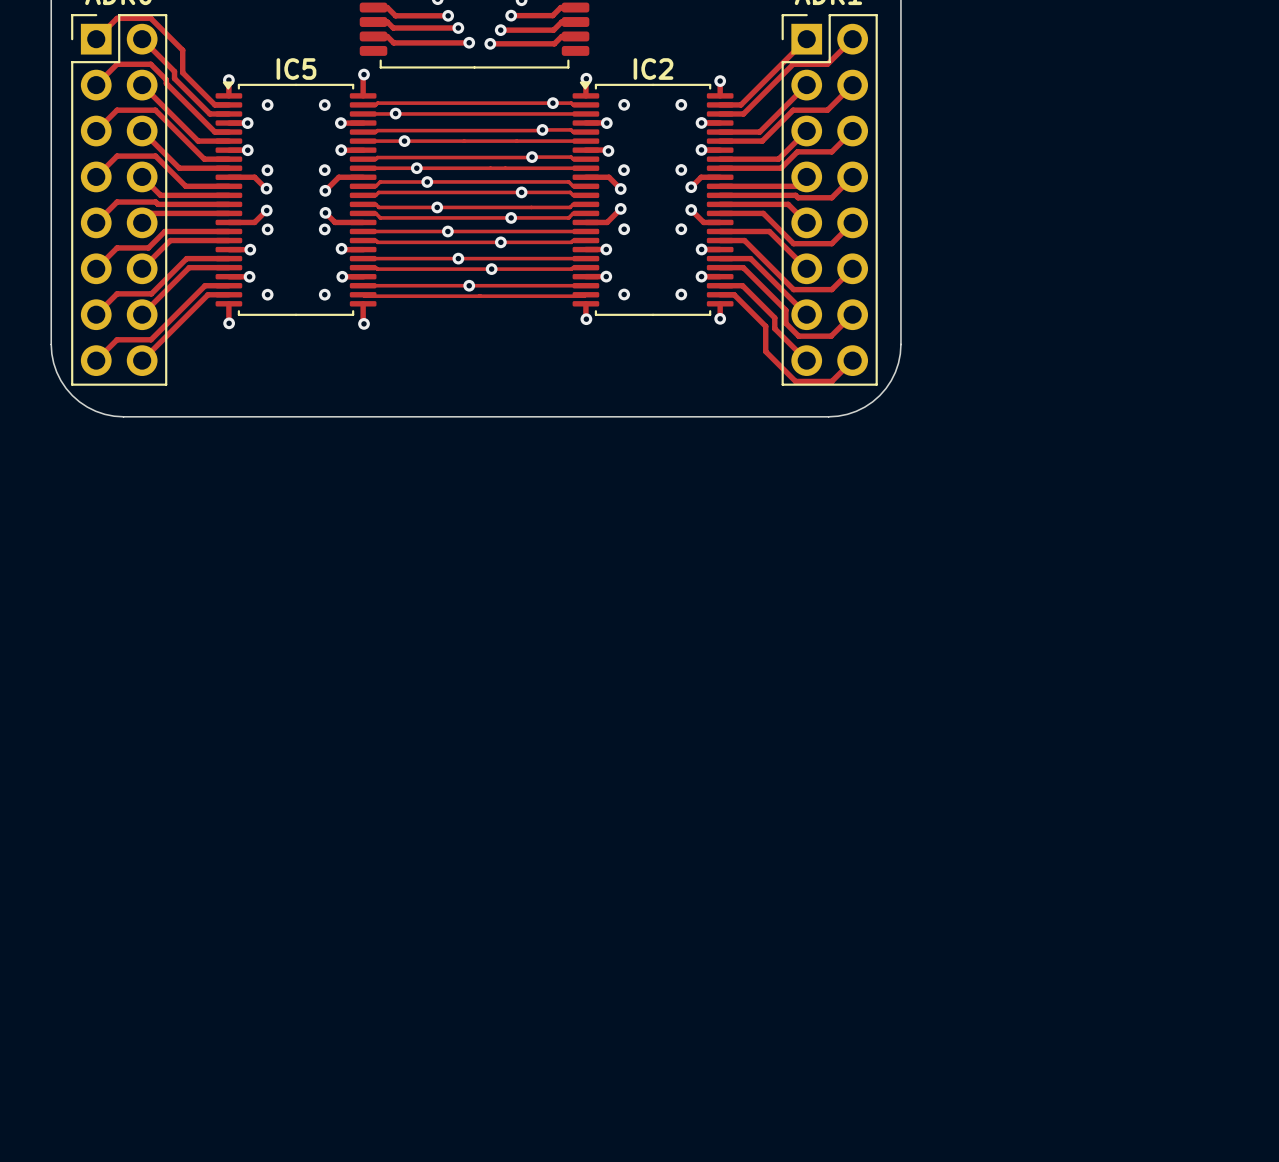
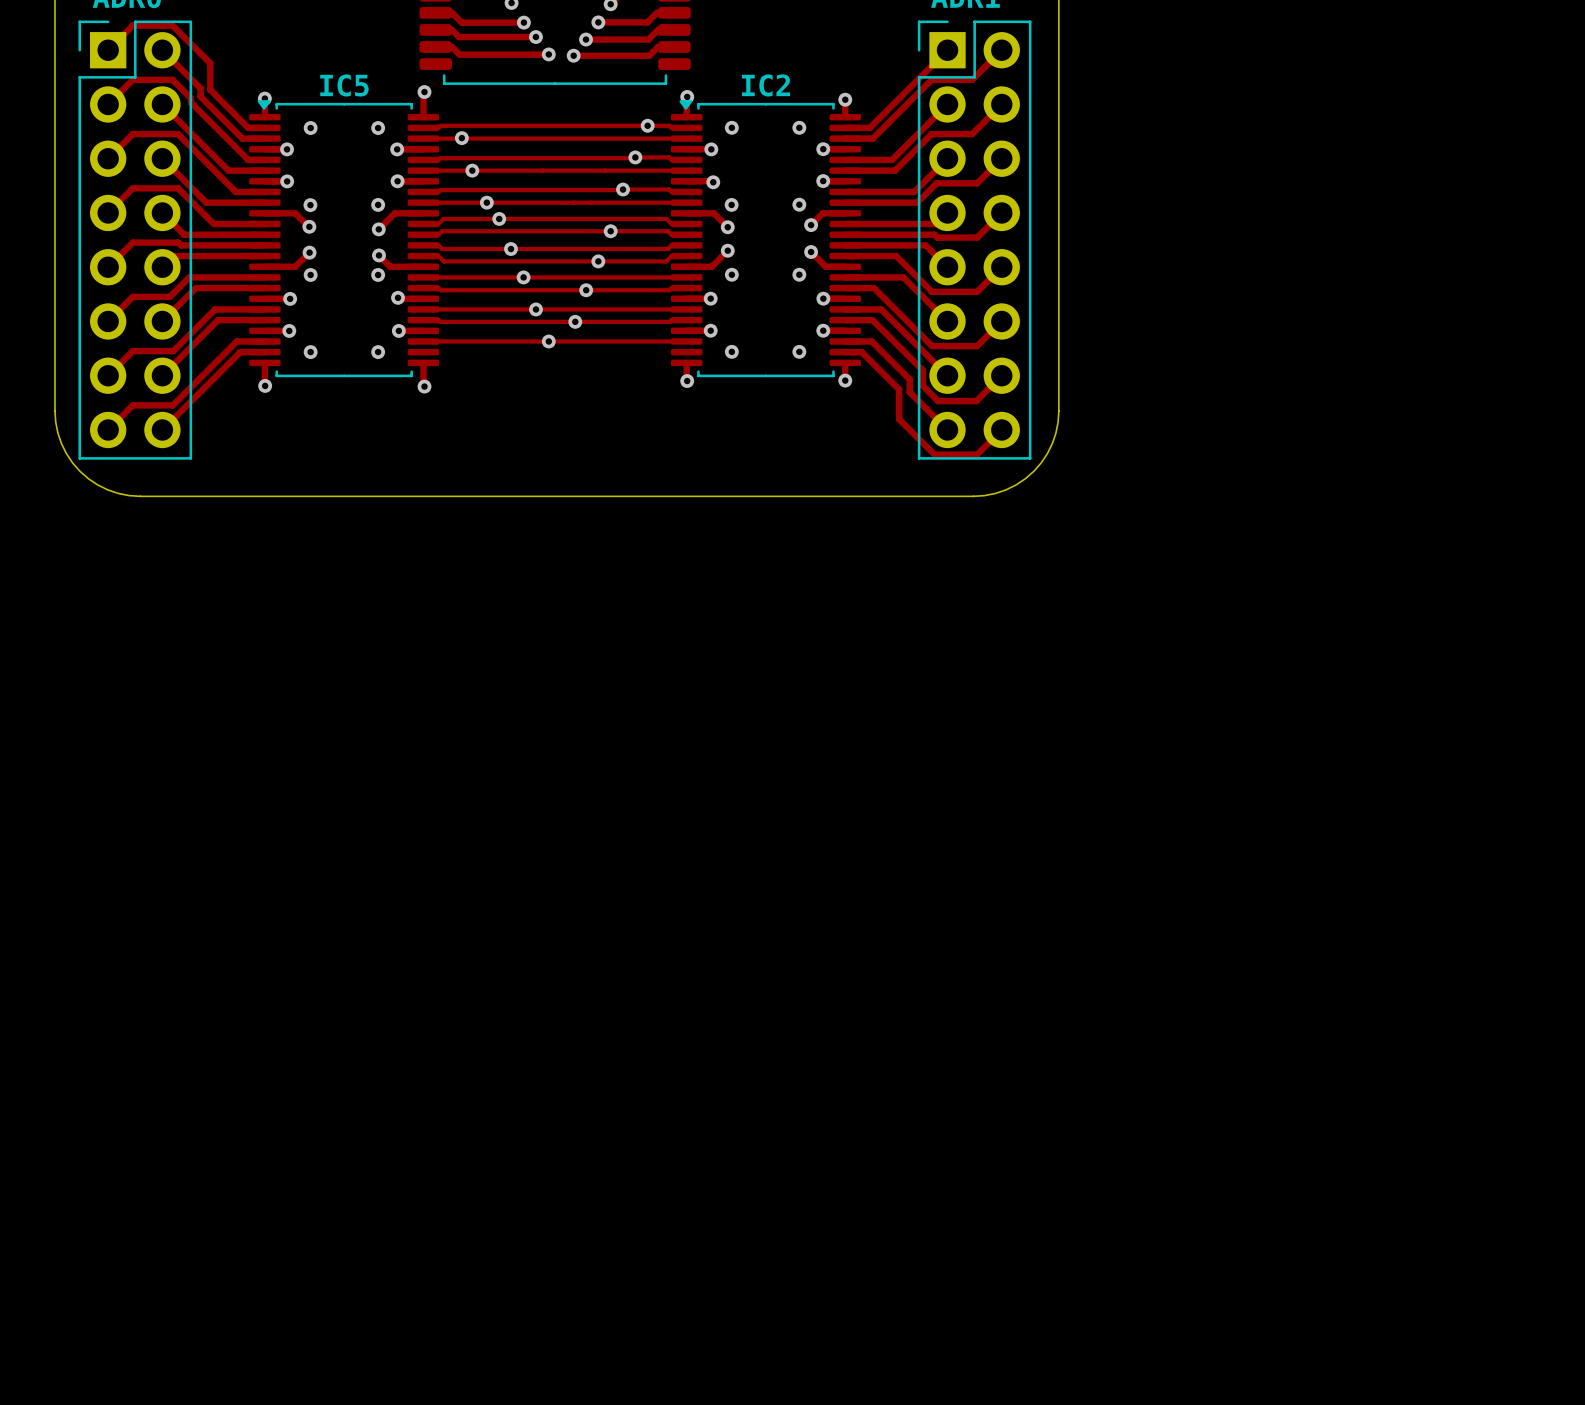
track: (363, 294) (585, 294) -> none

